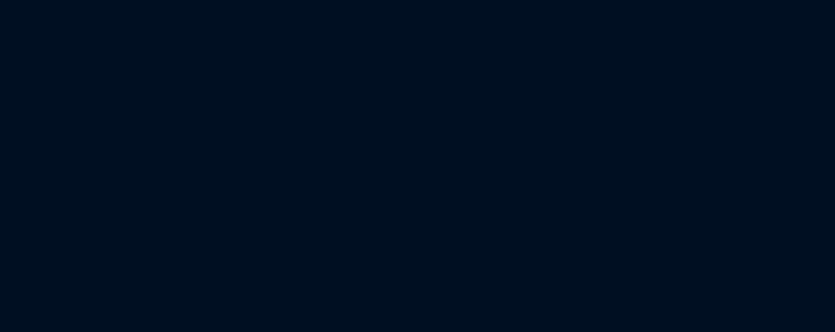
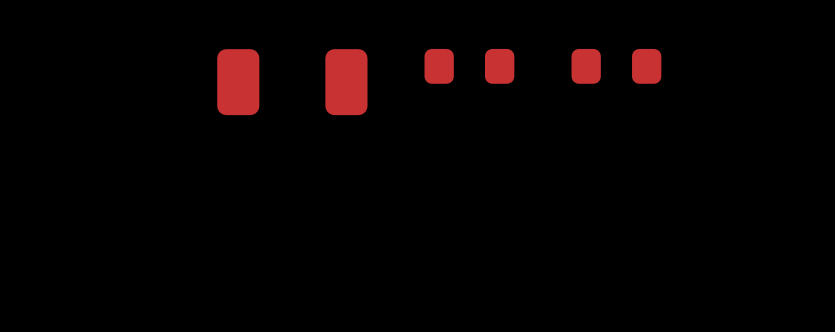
part: none -> (469, 66)
part: none -> (616, 66)
part: none -> (292, 82)

